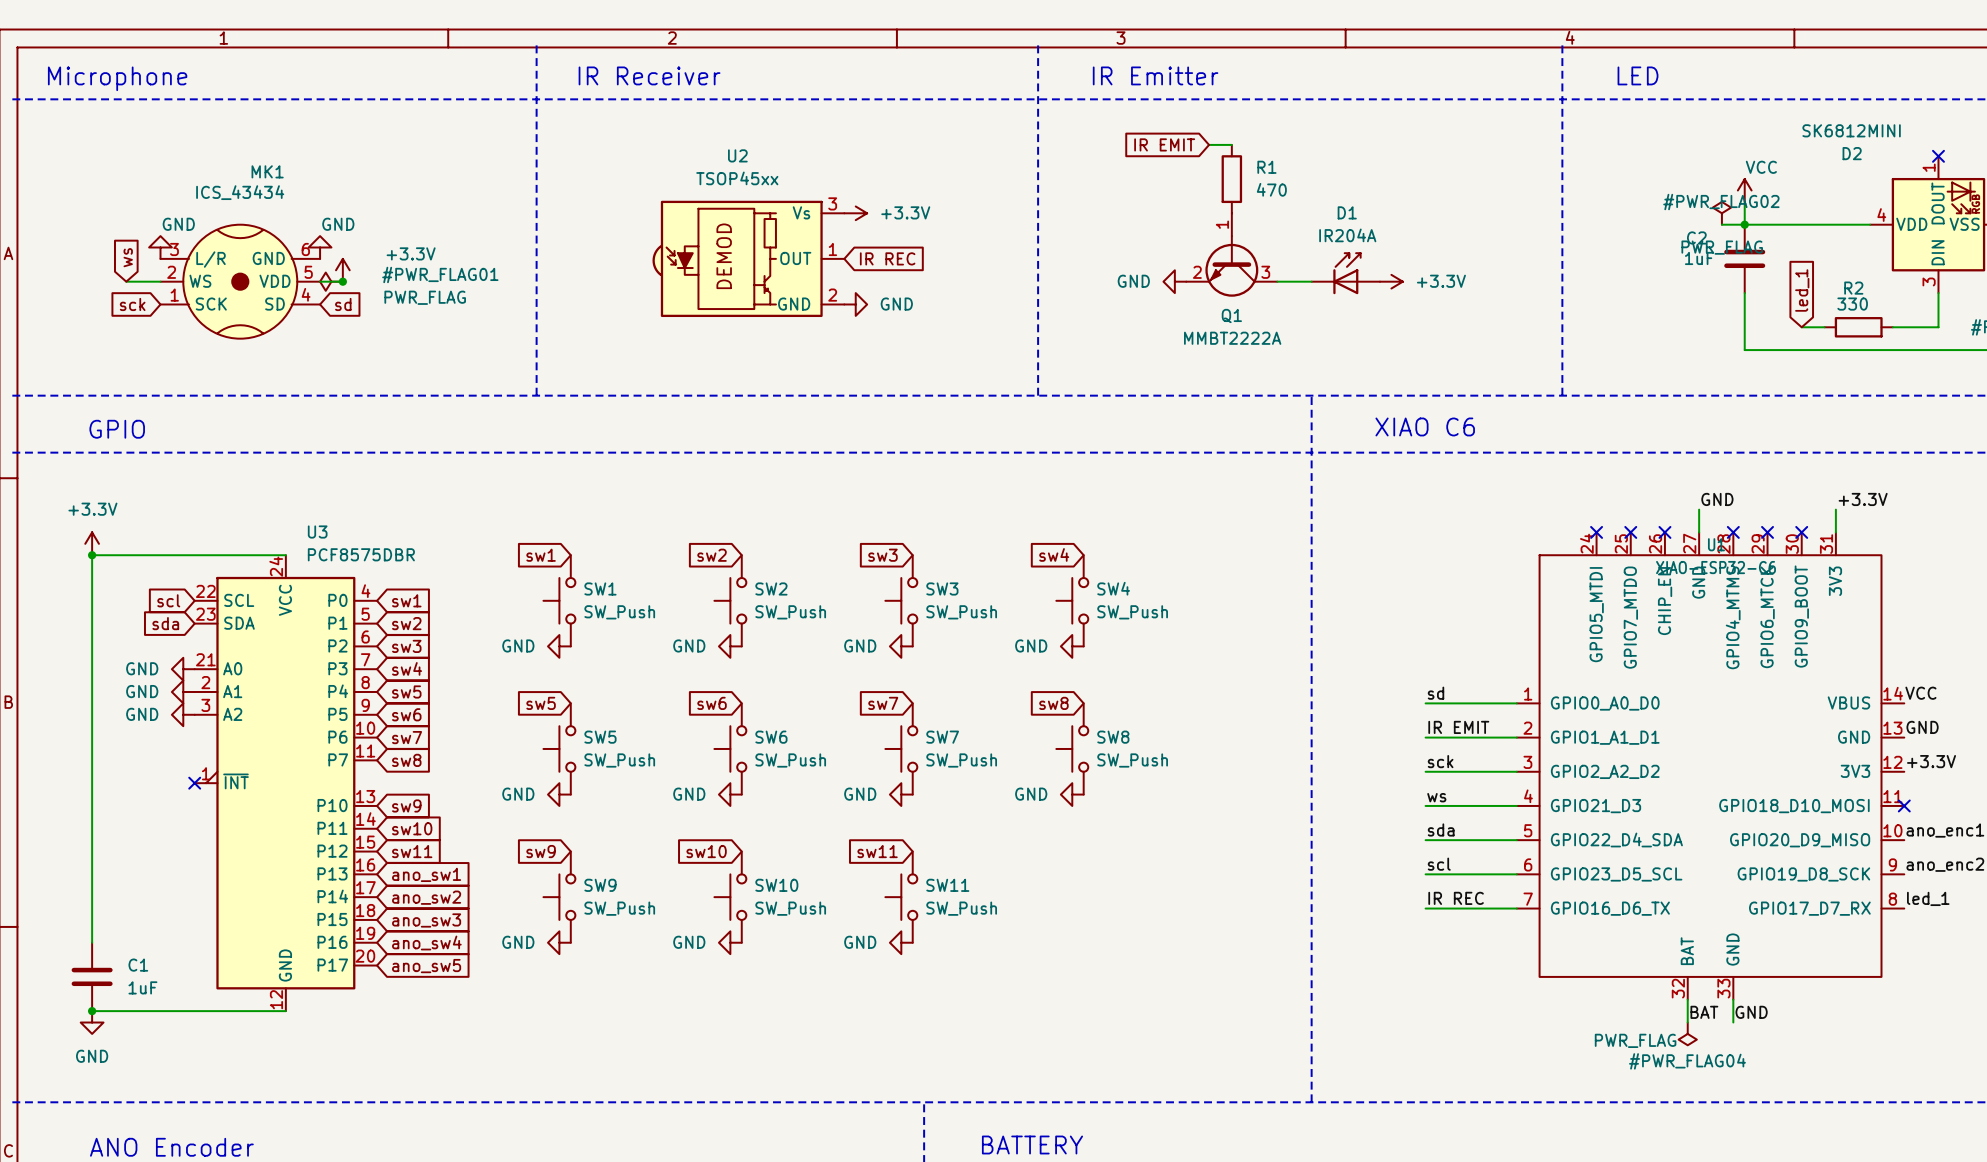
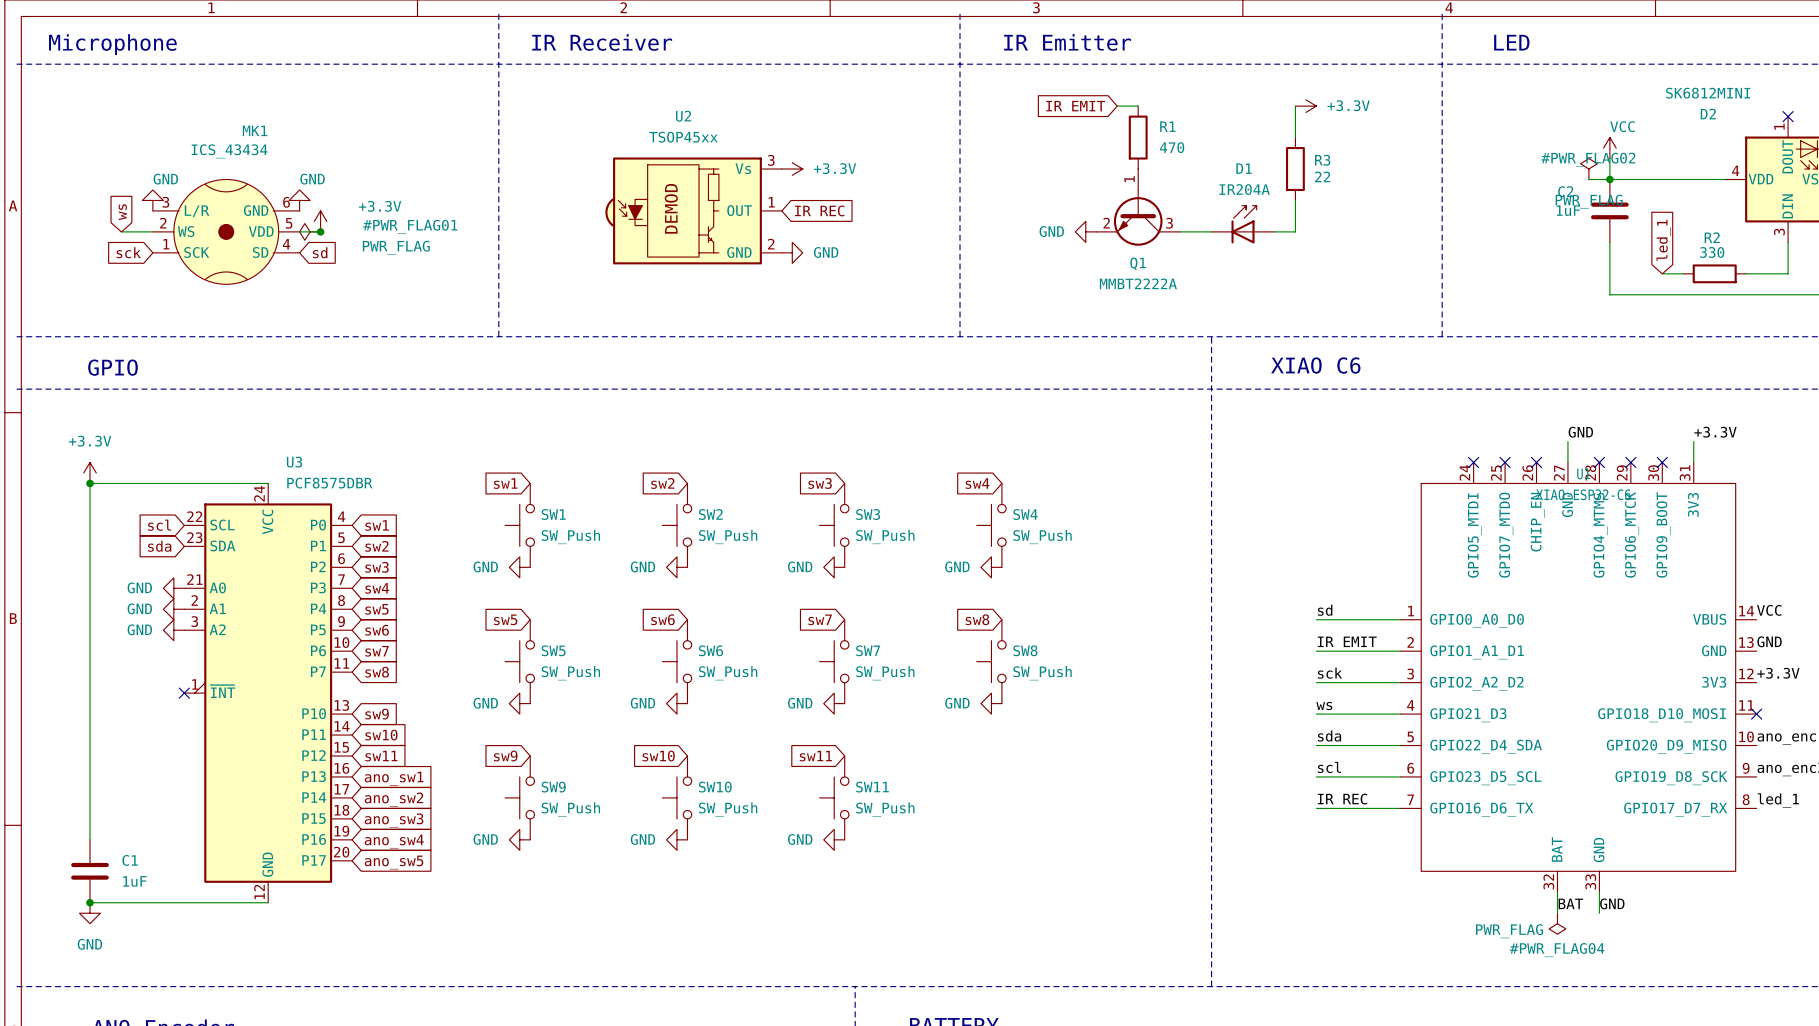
wire: none -> (1295, 106) (1295, 137)
R3: none -> 22 (1295, 169)
wire: none -> (1295, 200) (1295, 231) (1274, 231)
power symbol position: +3.3V (1391, 281) -> +3.3V (1305, 106)

